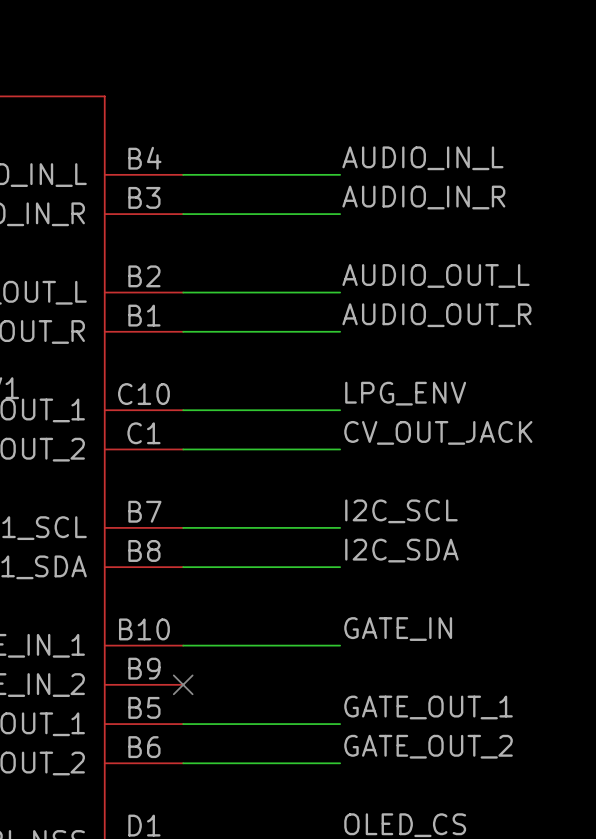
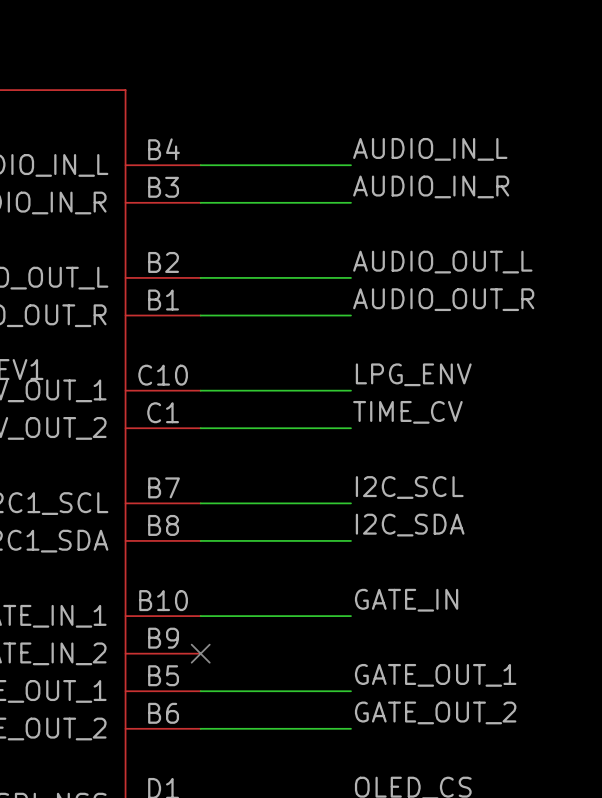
label: CV_OUT_JACK (438, 432) -> TIME_CV (407, 412)

